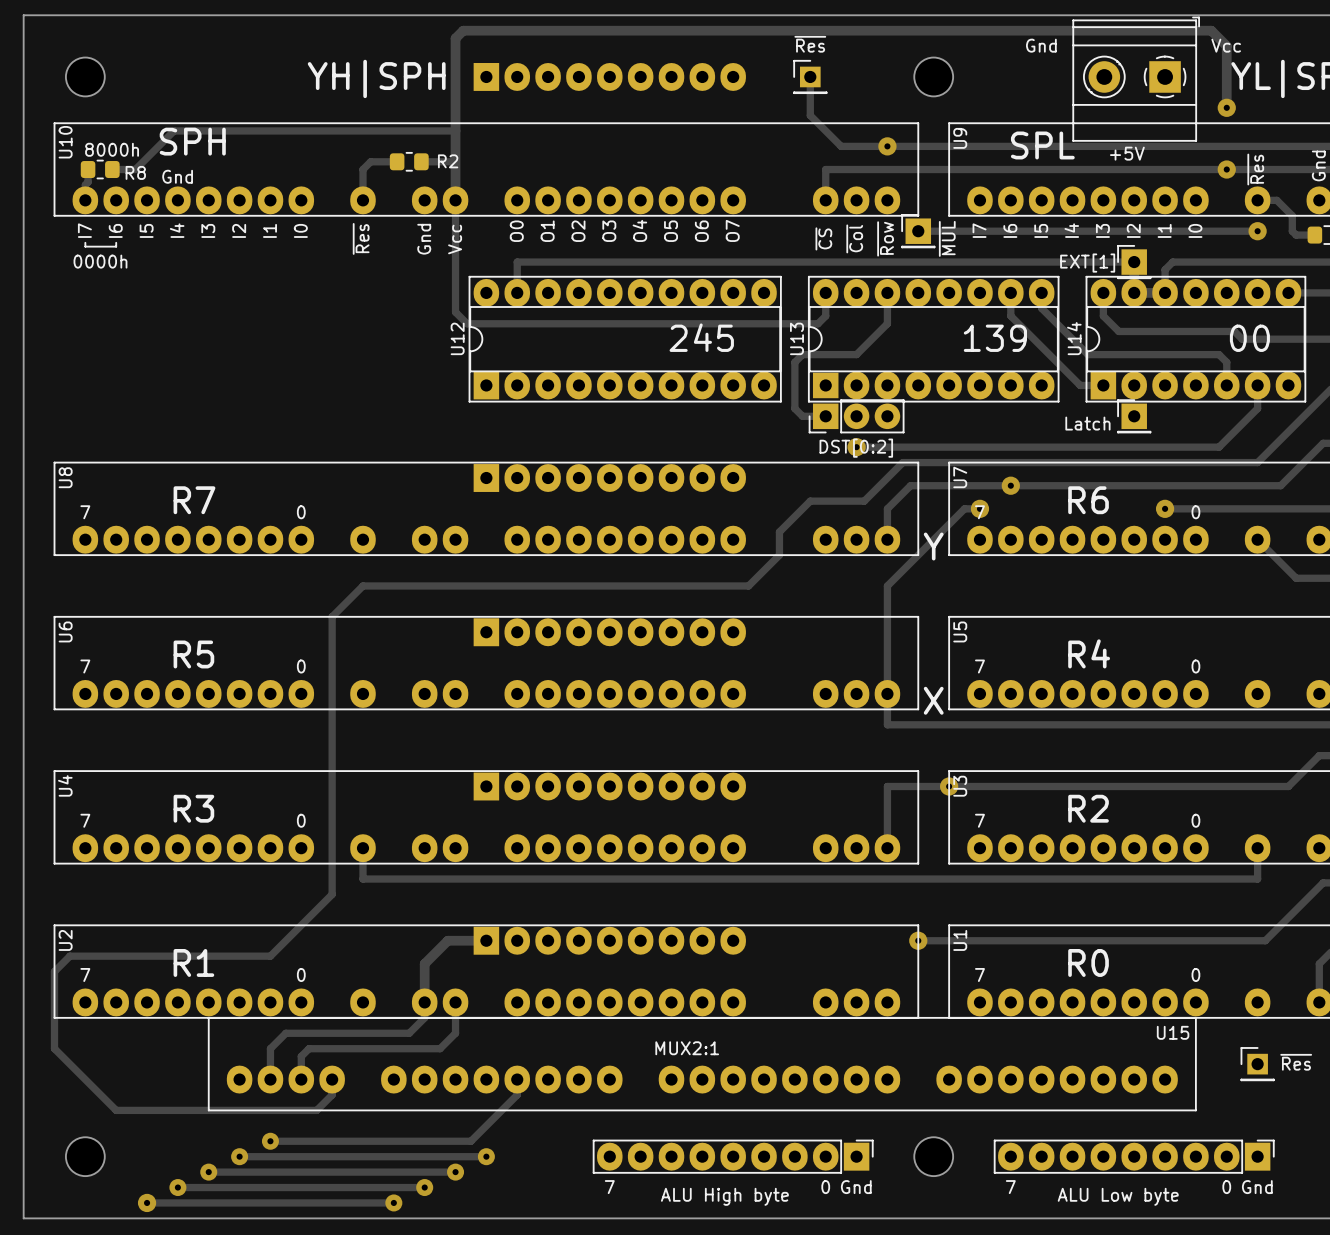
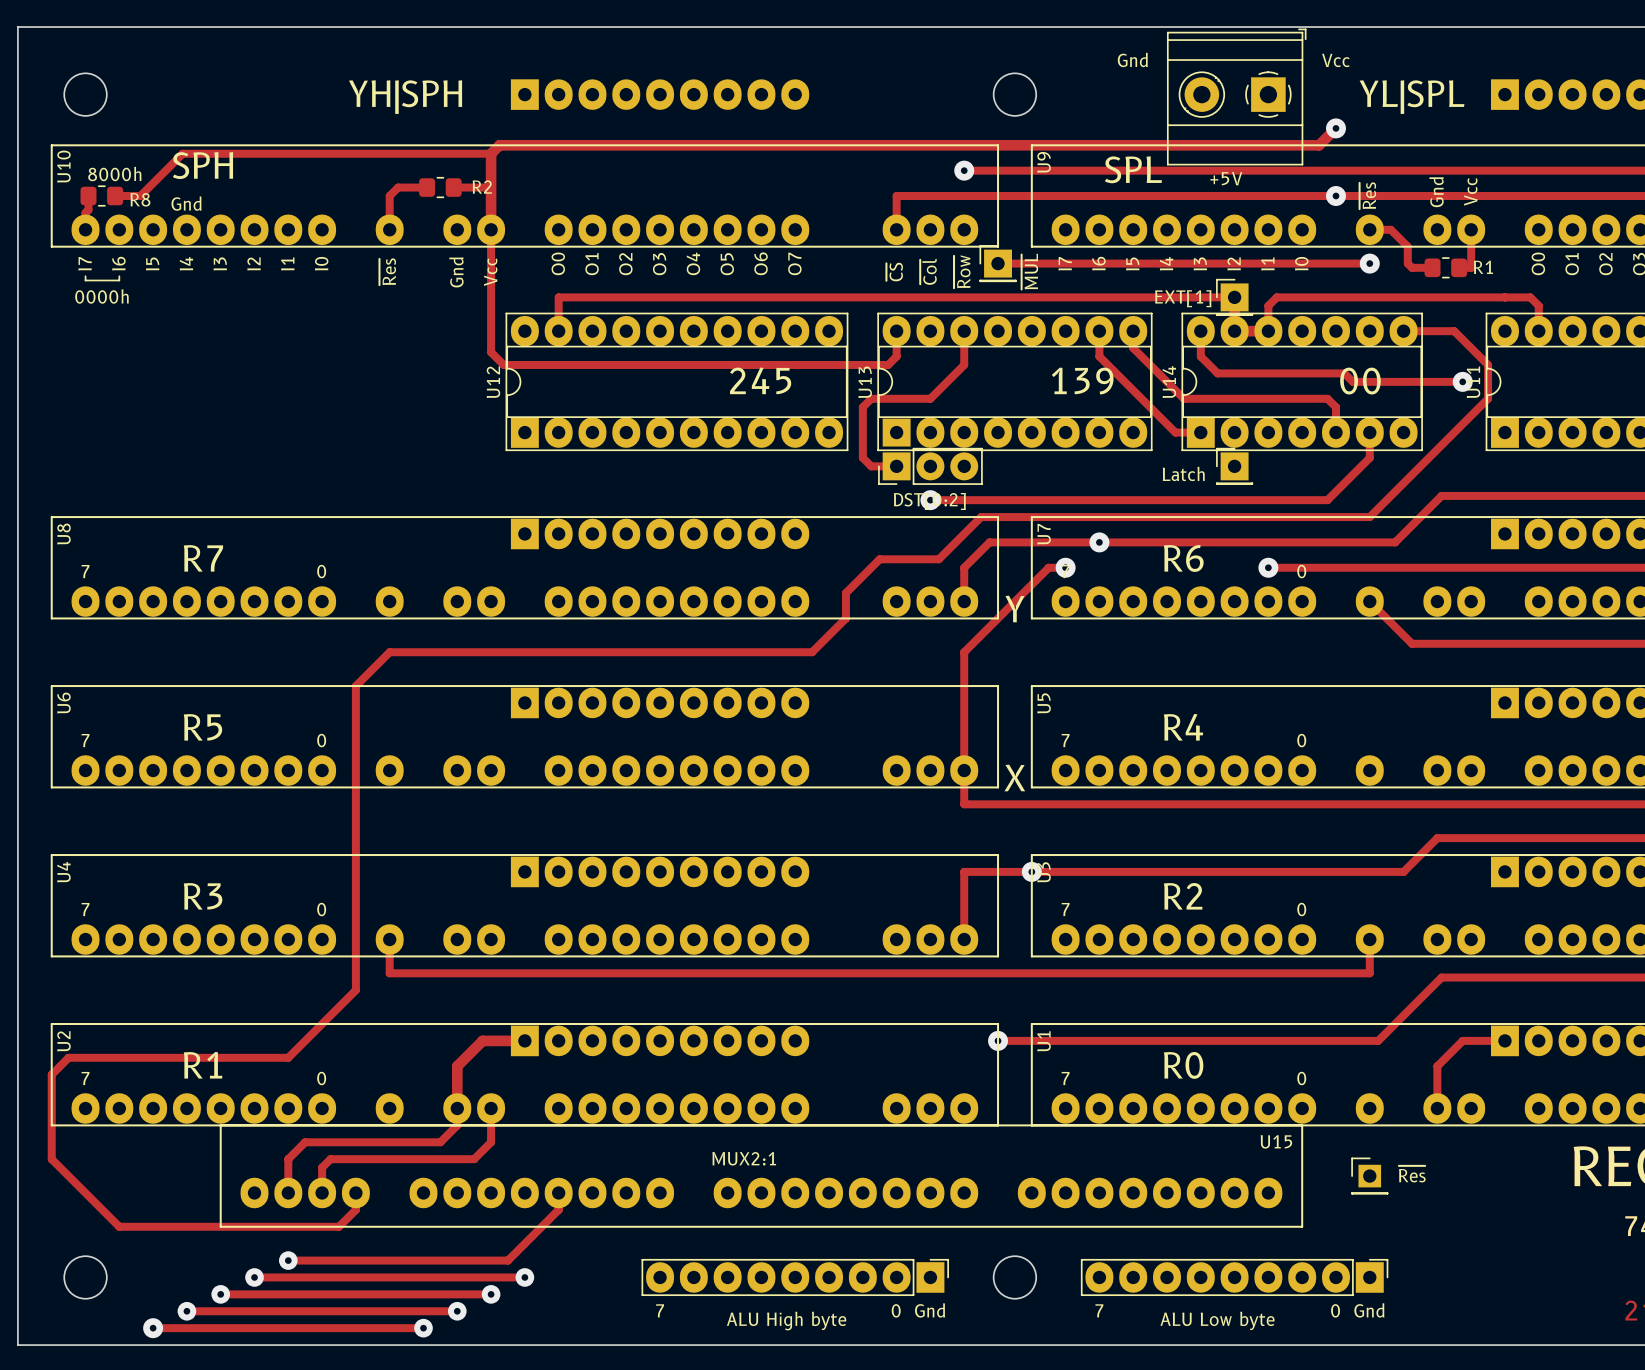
text: ~{Res} (810, 44) -> none
track: (810, 76) (810, 115) (841, 146) (887, 146) -> none
part: (810, 76) -> none
track: (1226, 107) (1226, 46) (1211, 30) (463, 30) (455, 38) (455, 130) -> (1335, 128) (1319, 145) (499, 145) (491, 153)

